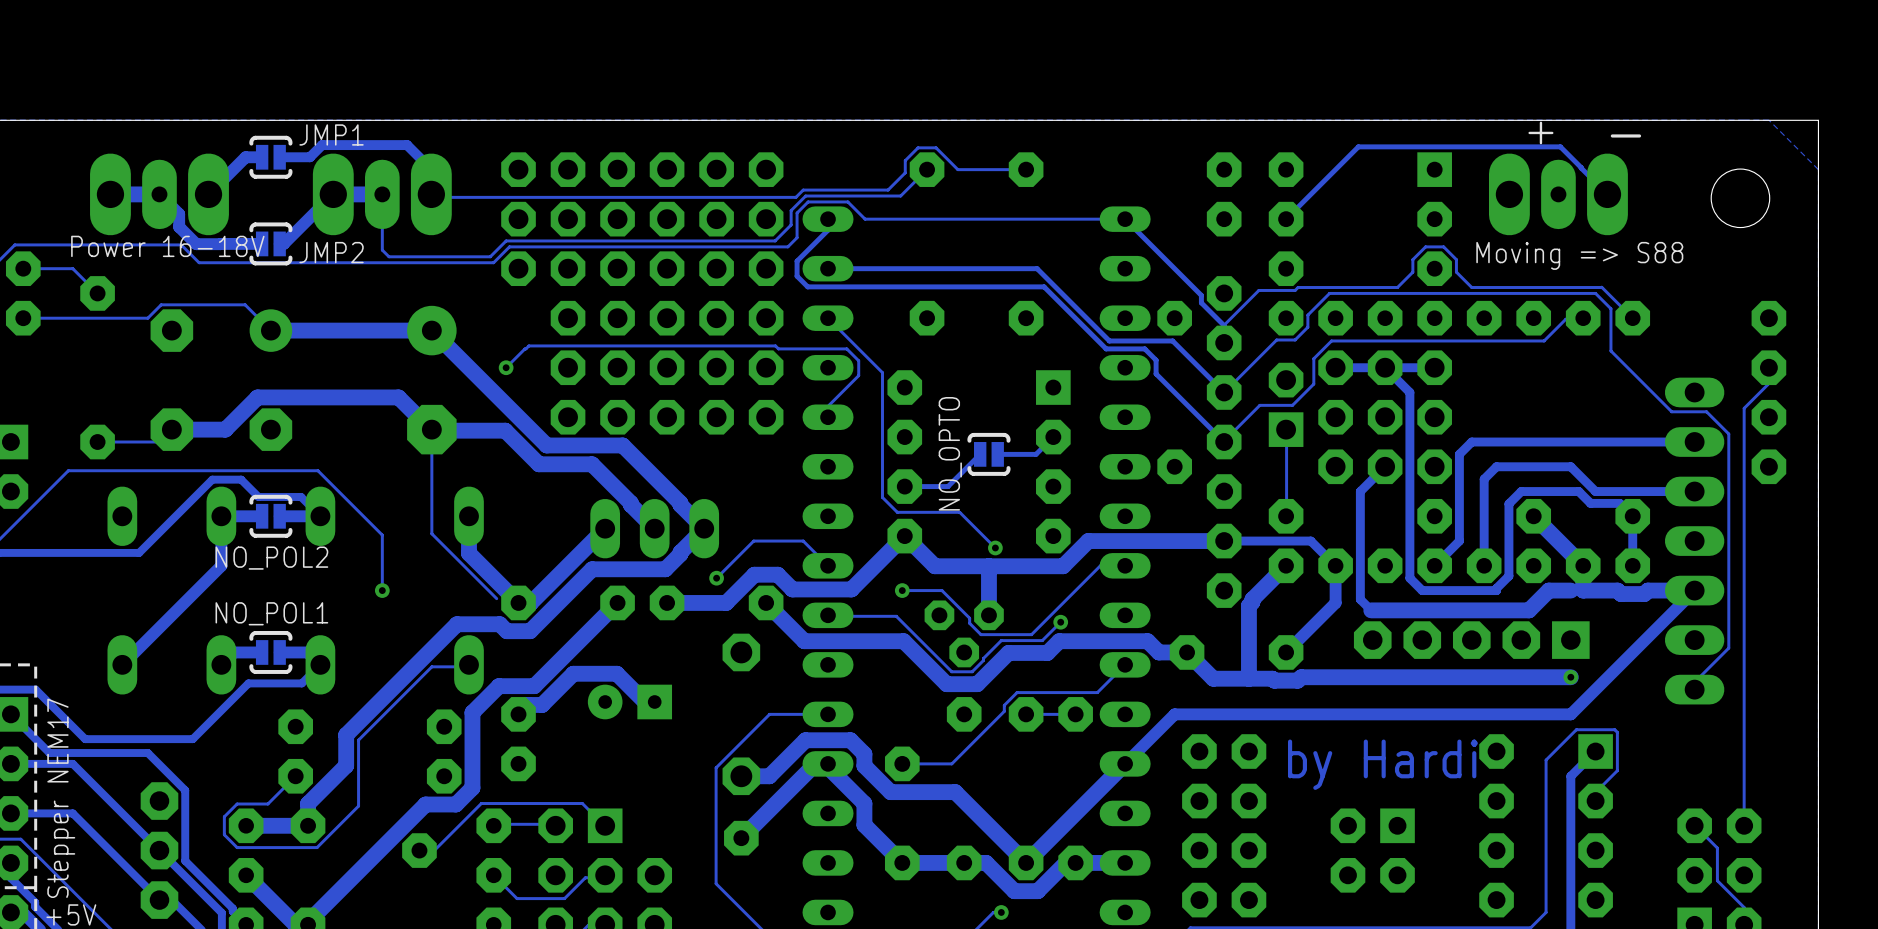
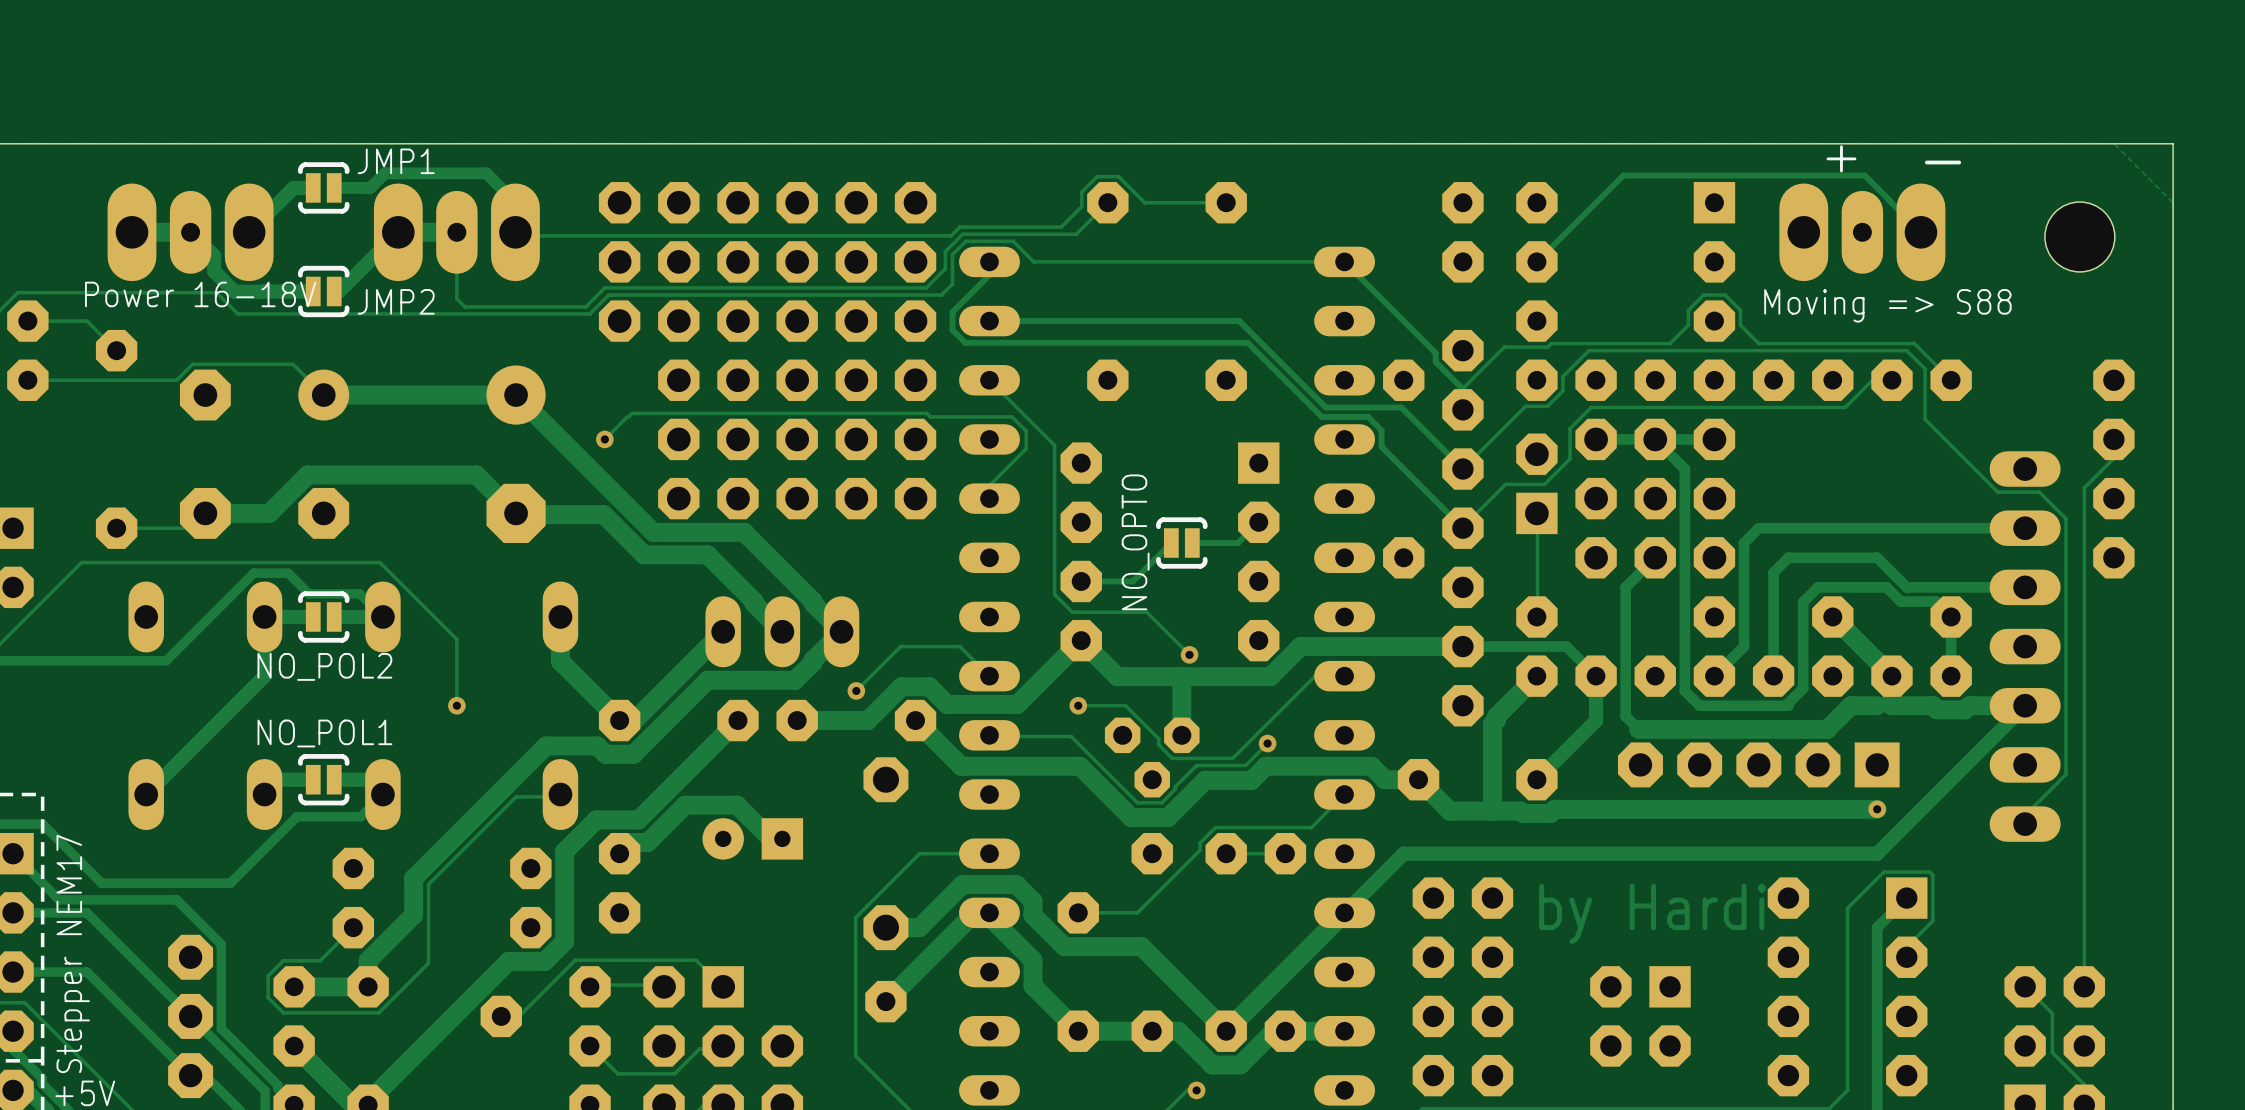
track: (431, 429) (431, 533) (496, 598) -> none

